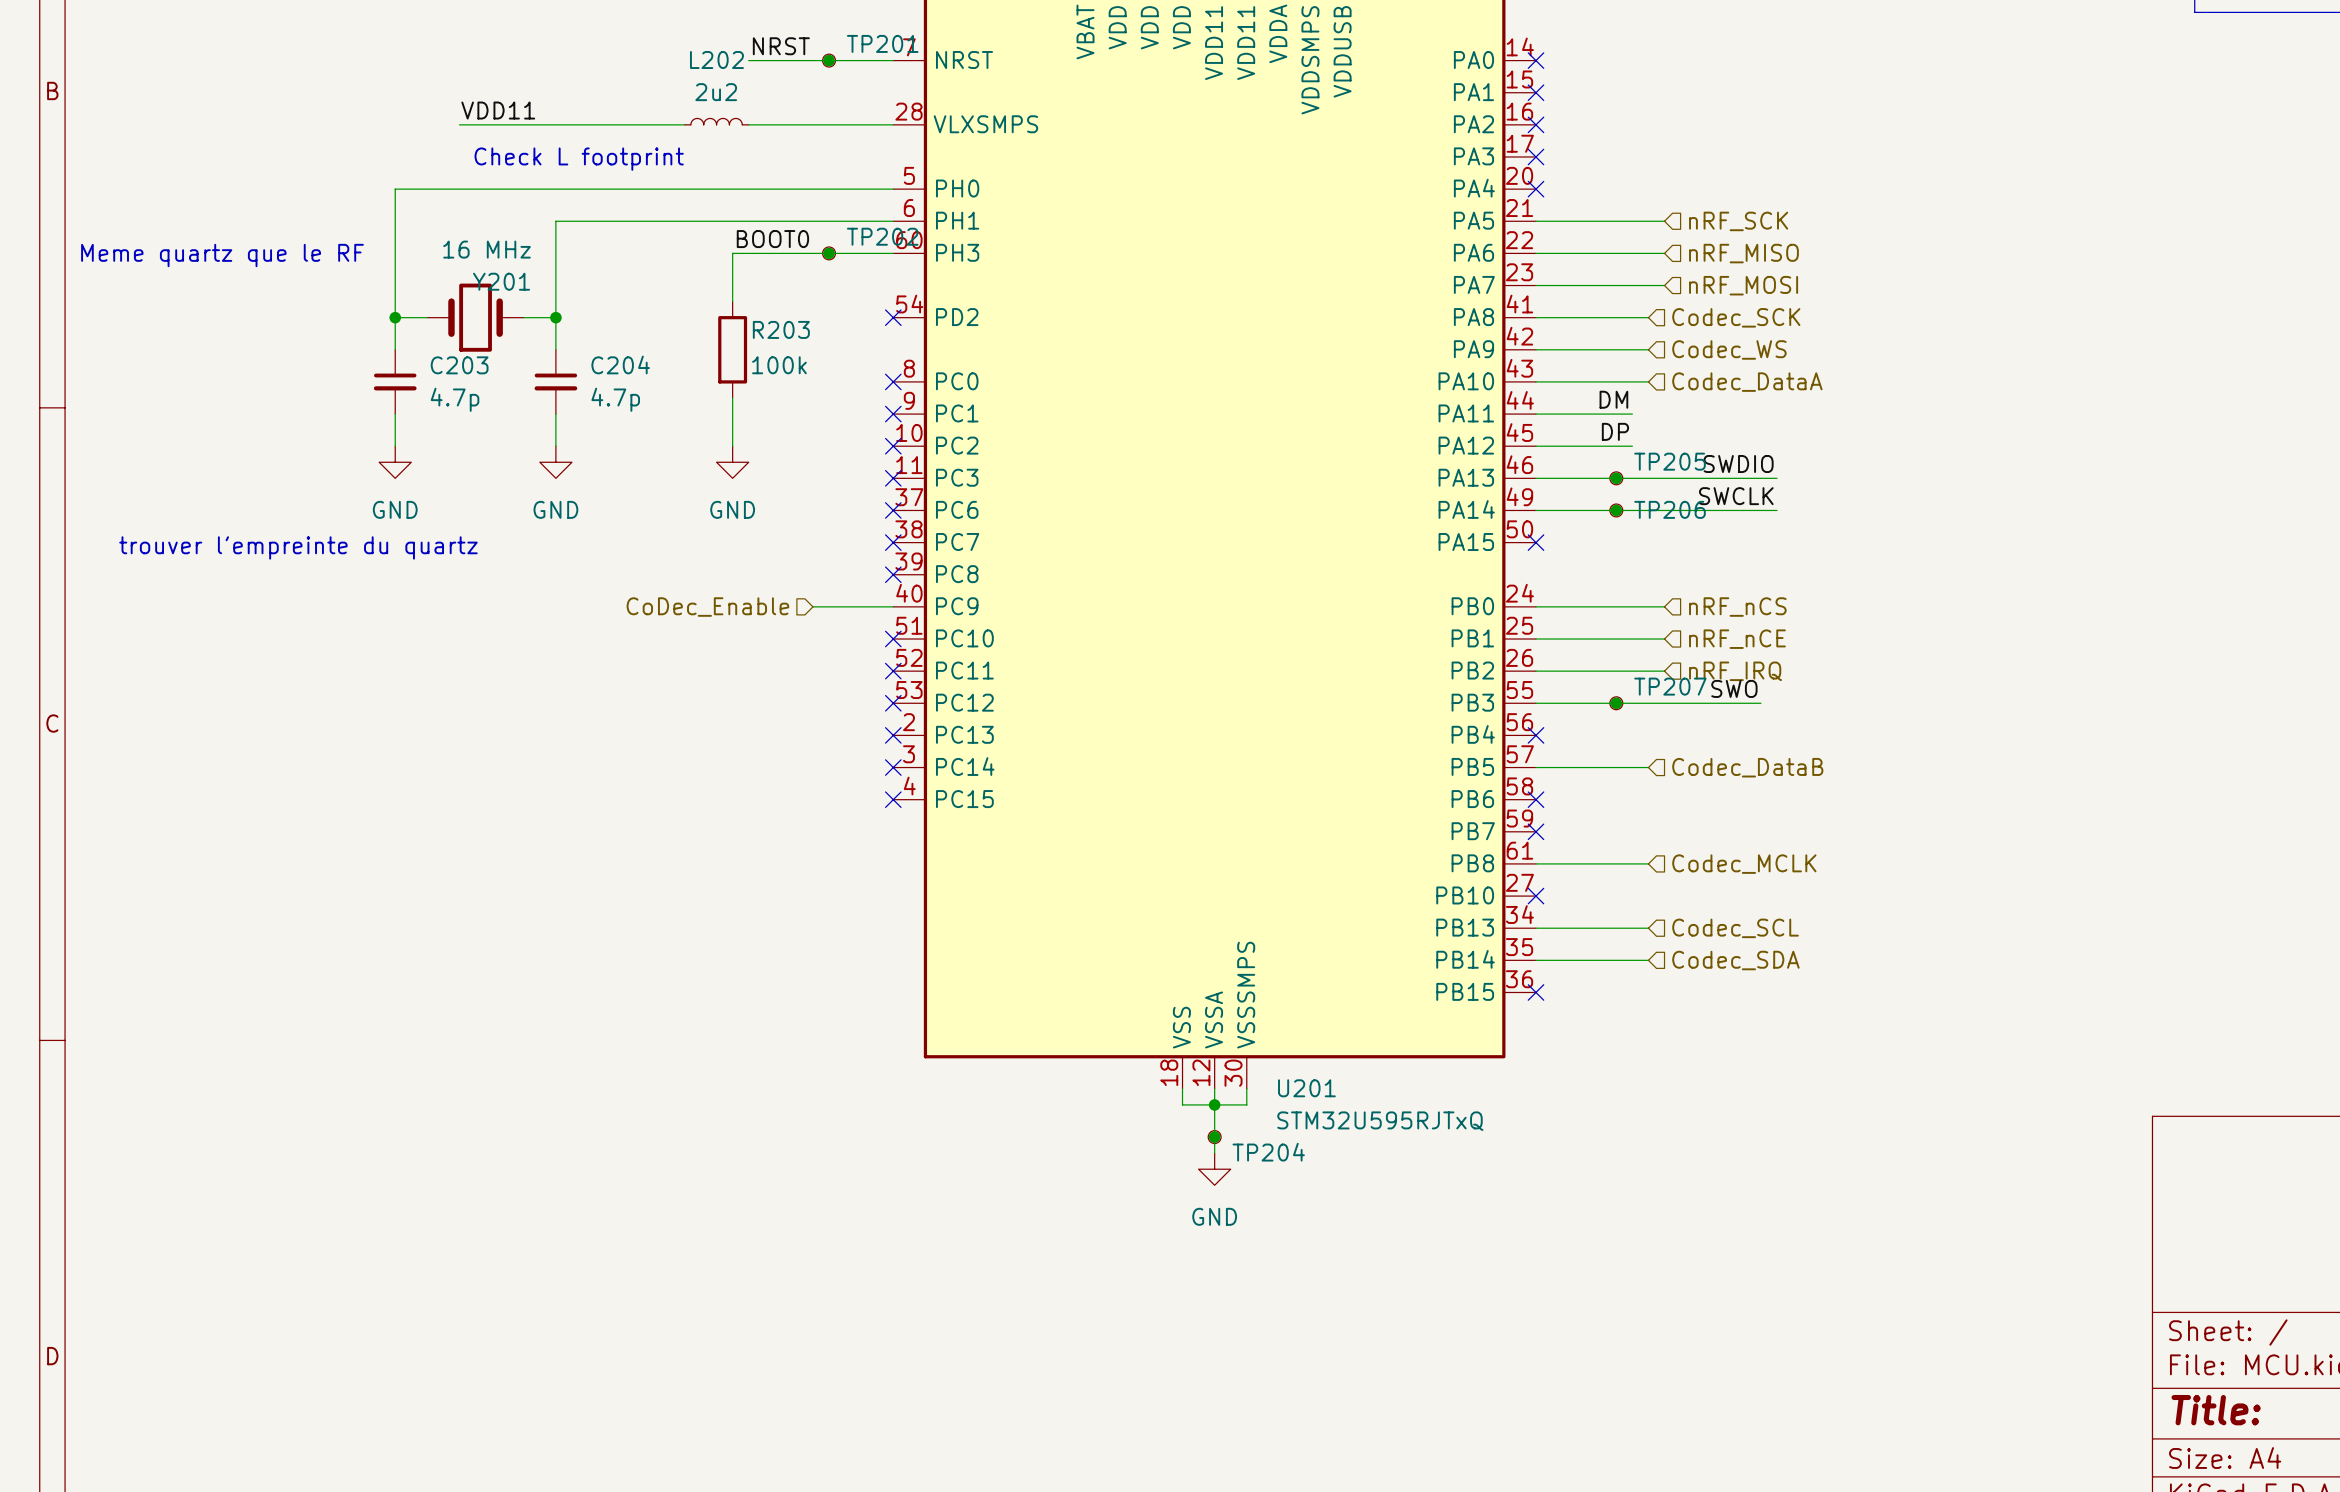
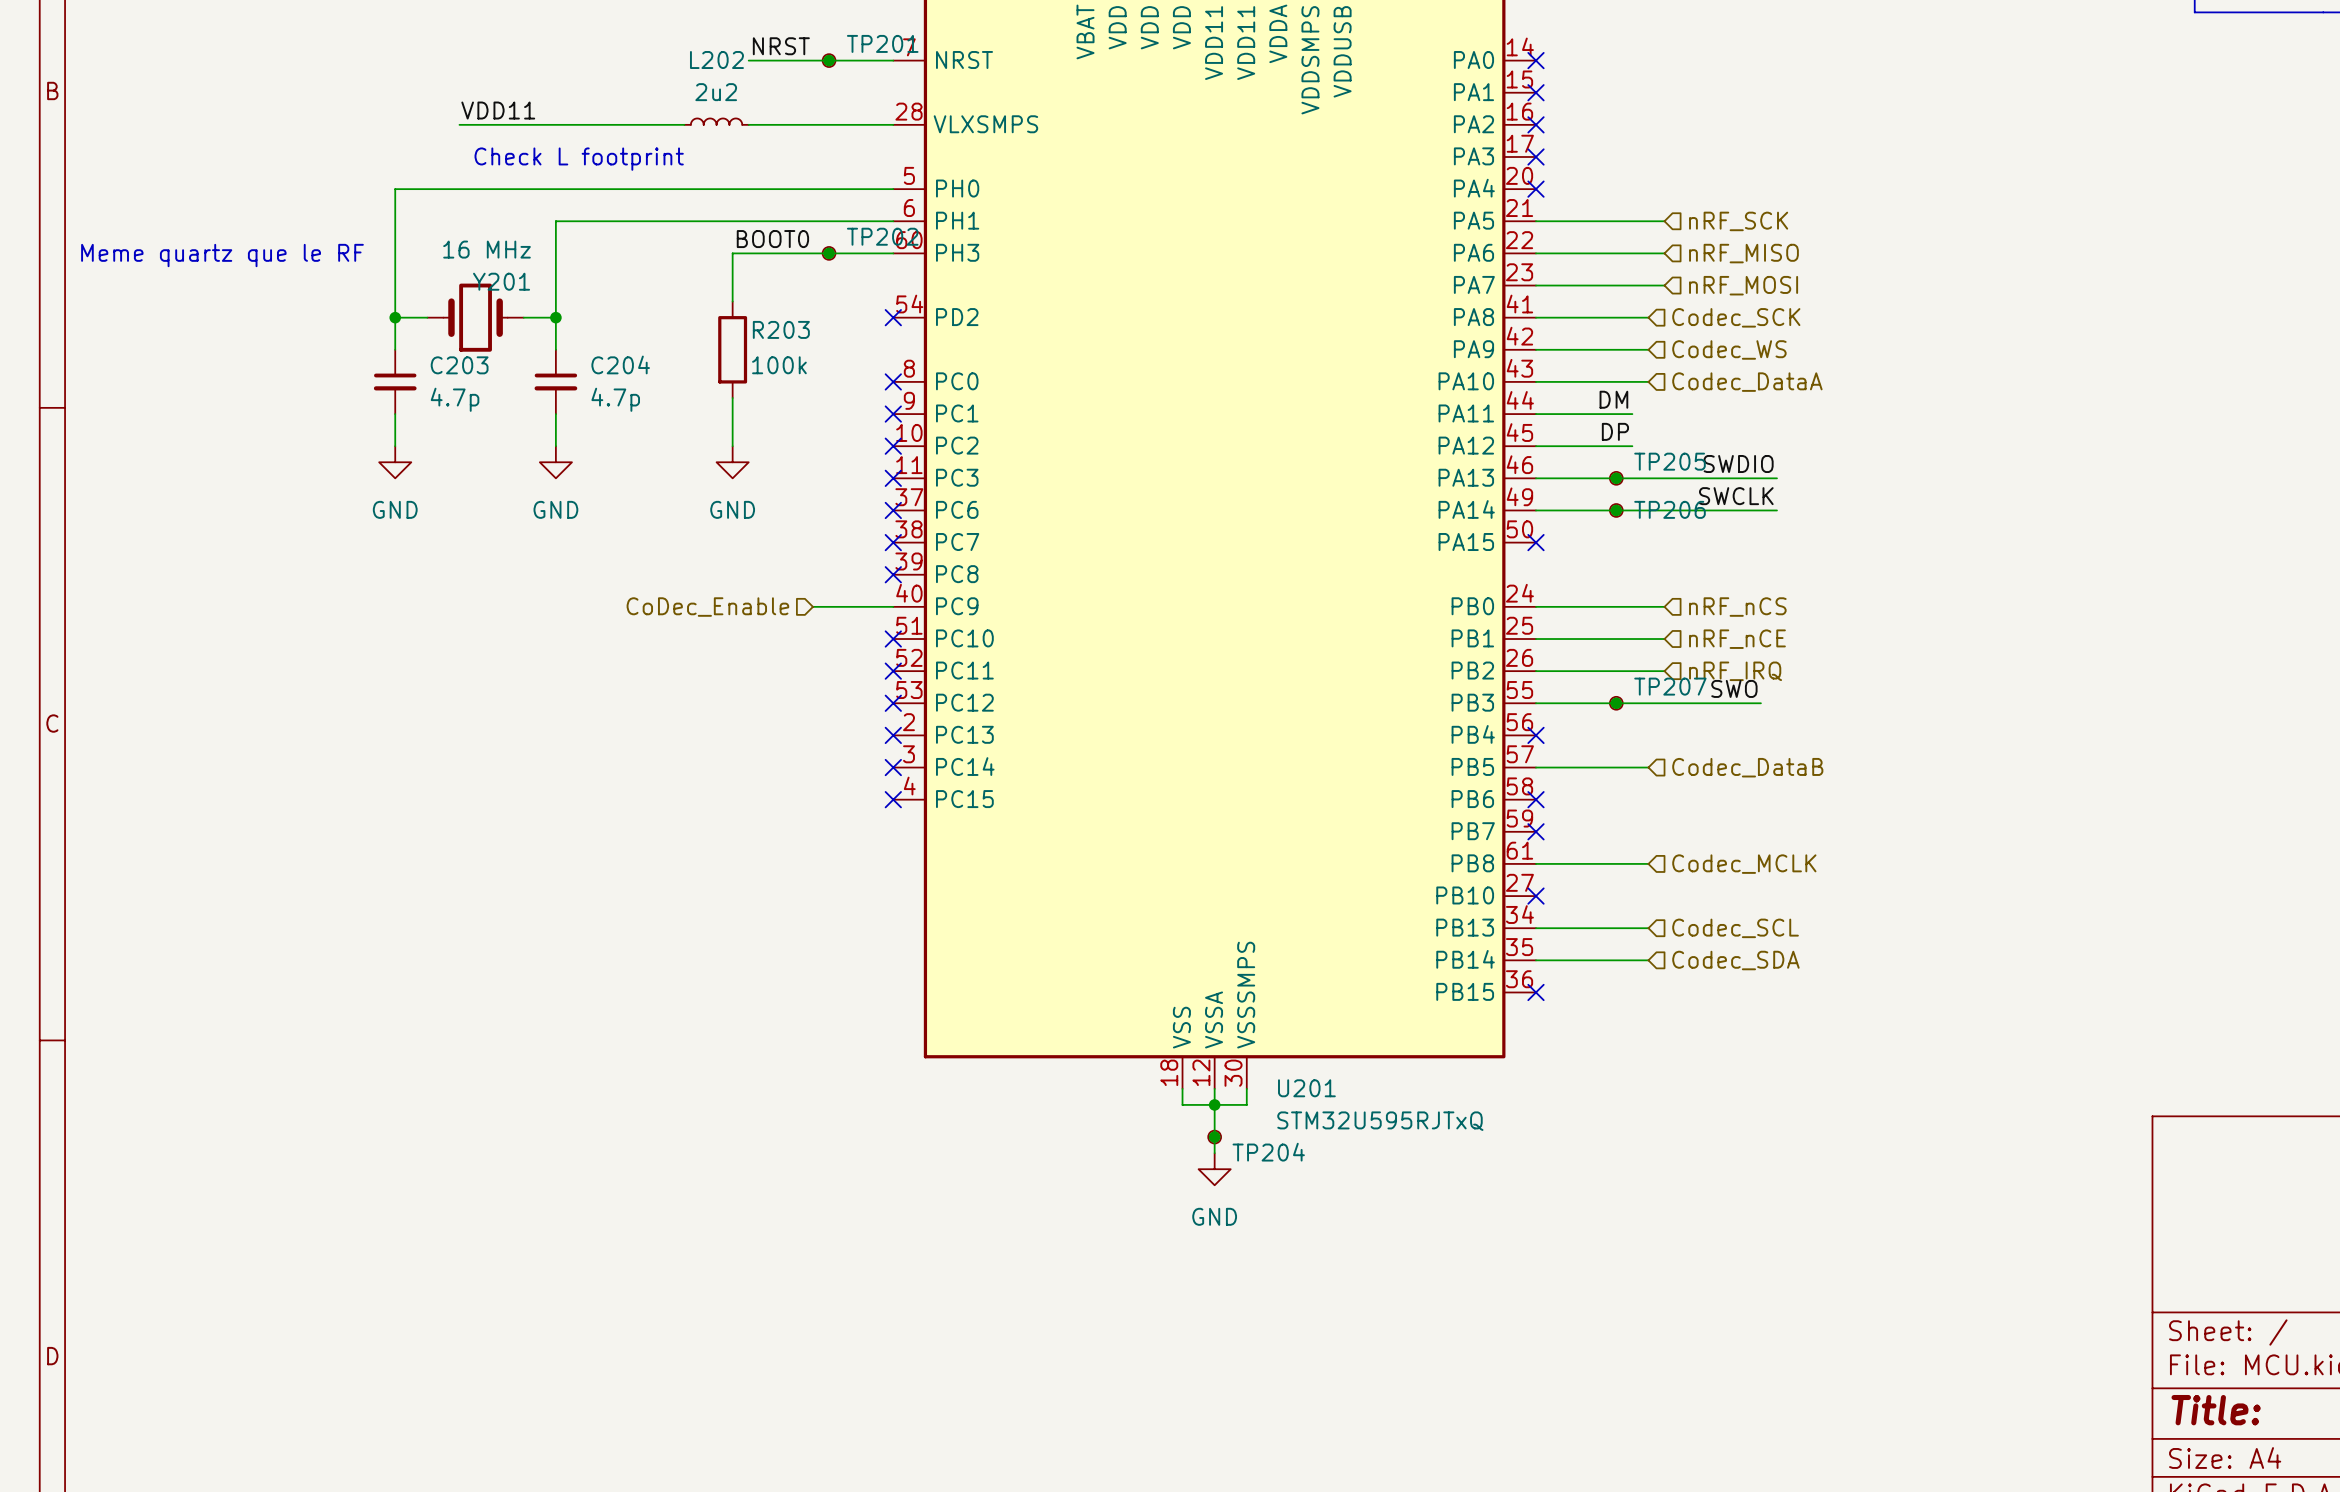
text: trouver l'empreinte du quartz (298, 547) -> none

